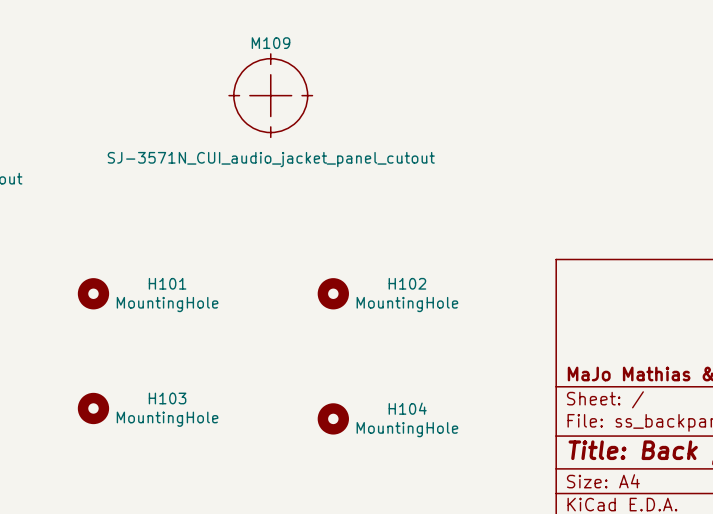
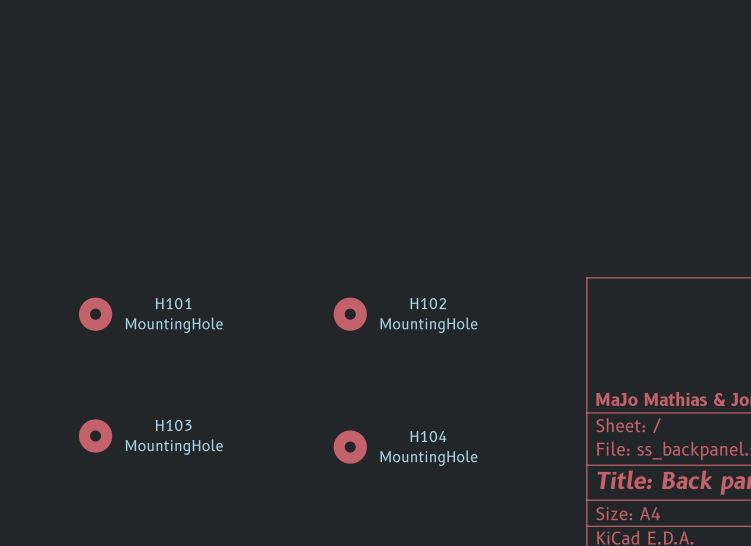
M109: SJ-3571N_CUI_audio_jacket_panel_cutout (270, 95) -> none

